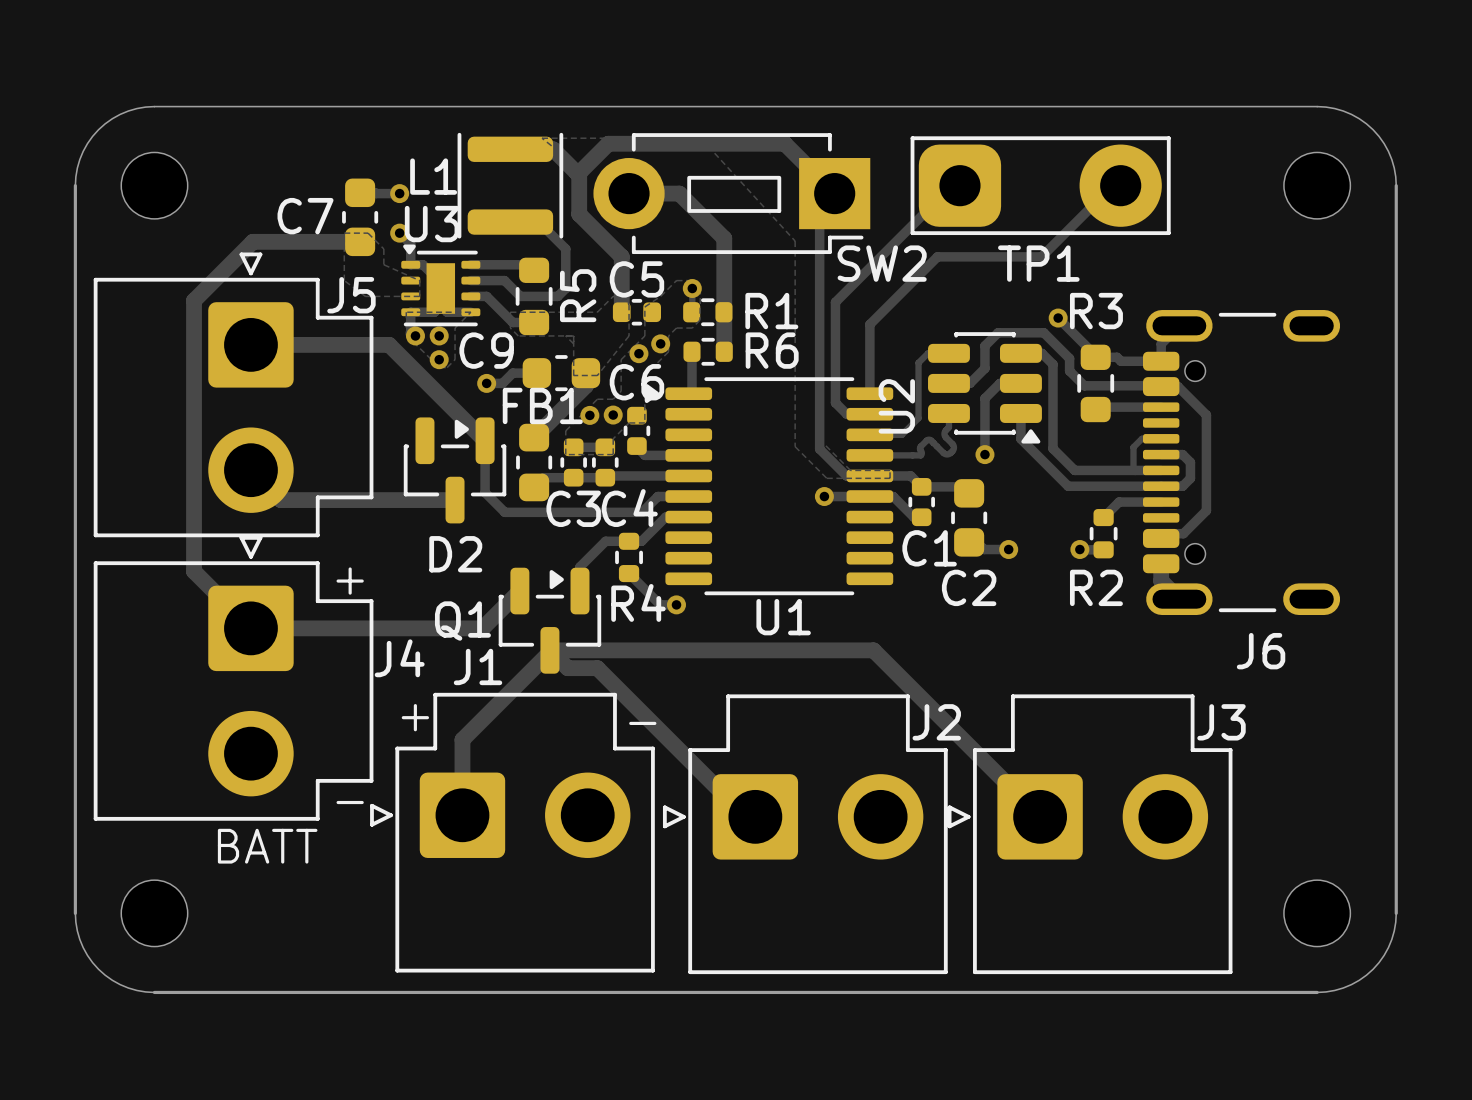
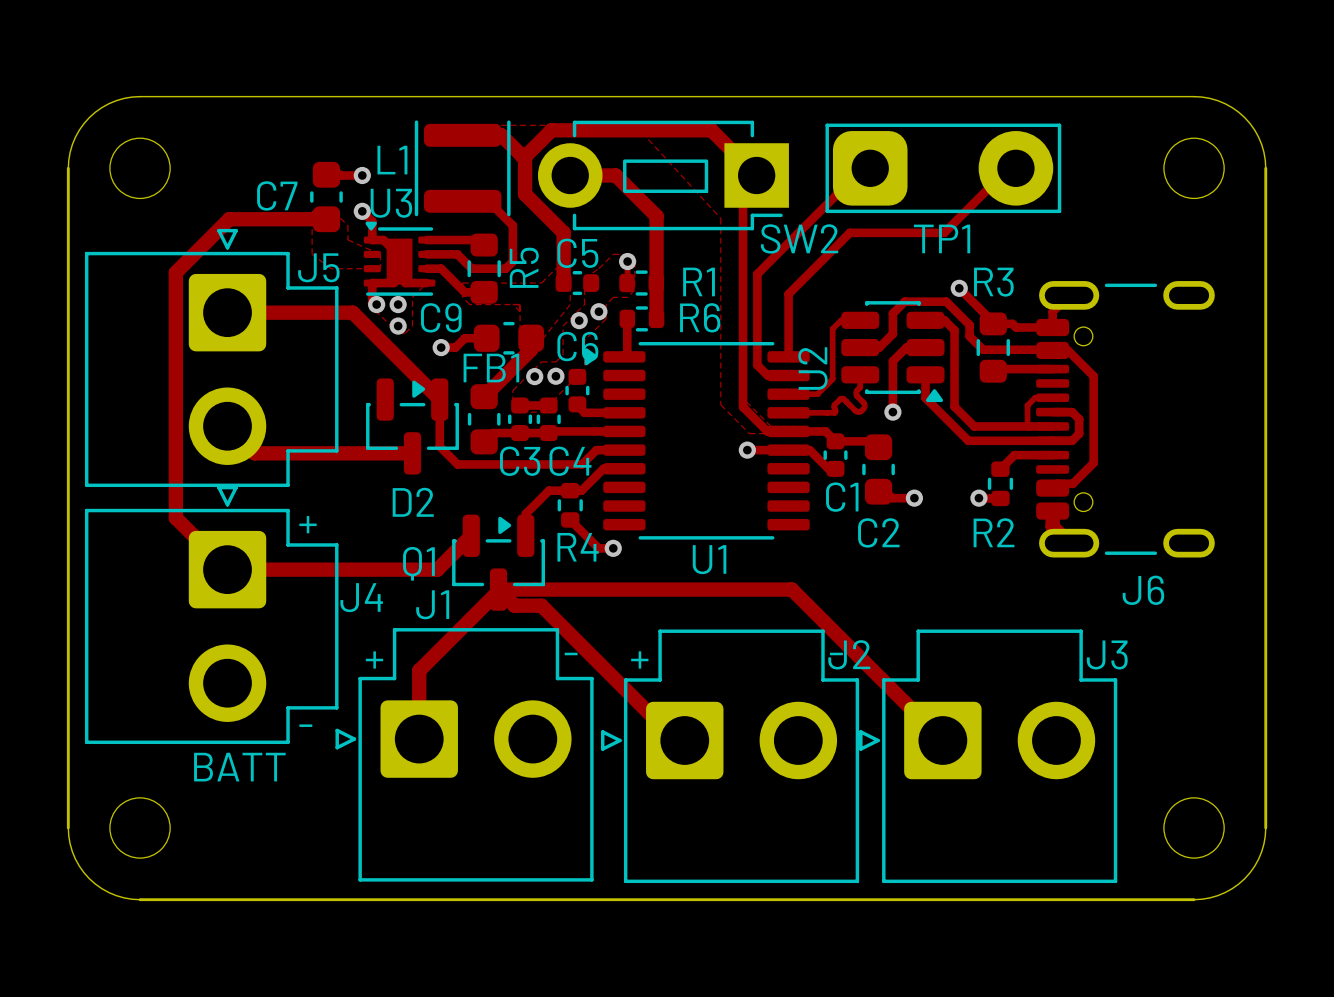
text: none -> + (639, 659)
text: none -> - (836, 653)

